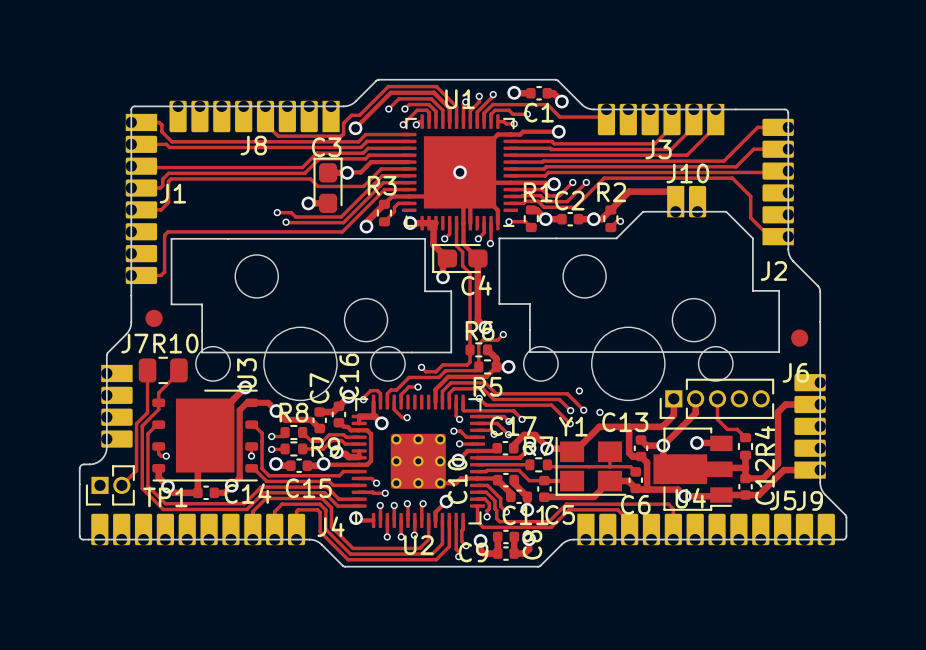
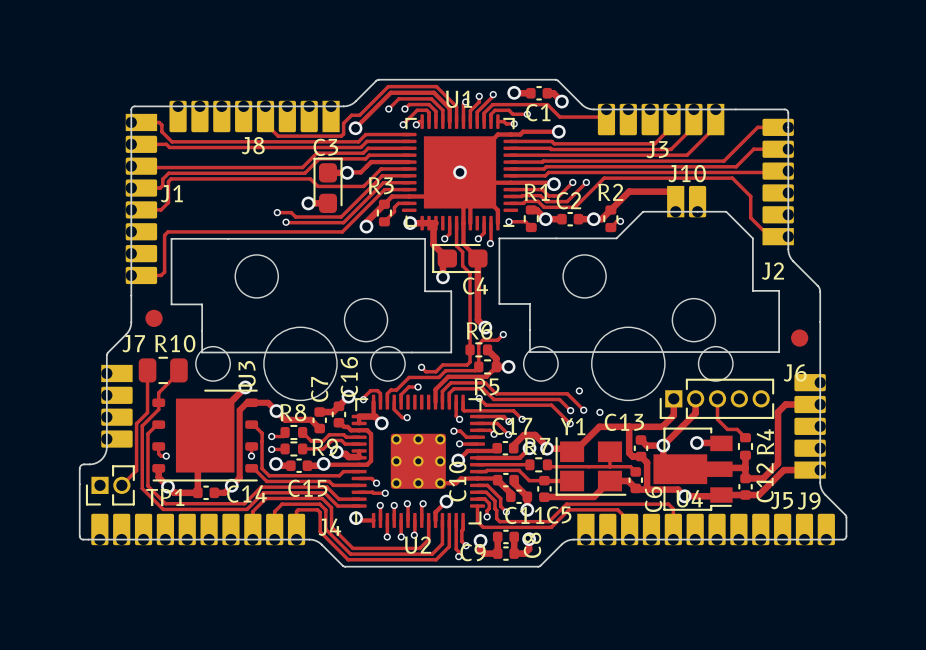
C6 name rotation: 0° (635, 504) -> 90° counterclockwise (653, 499)

